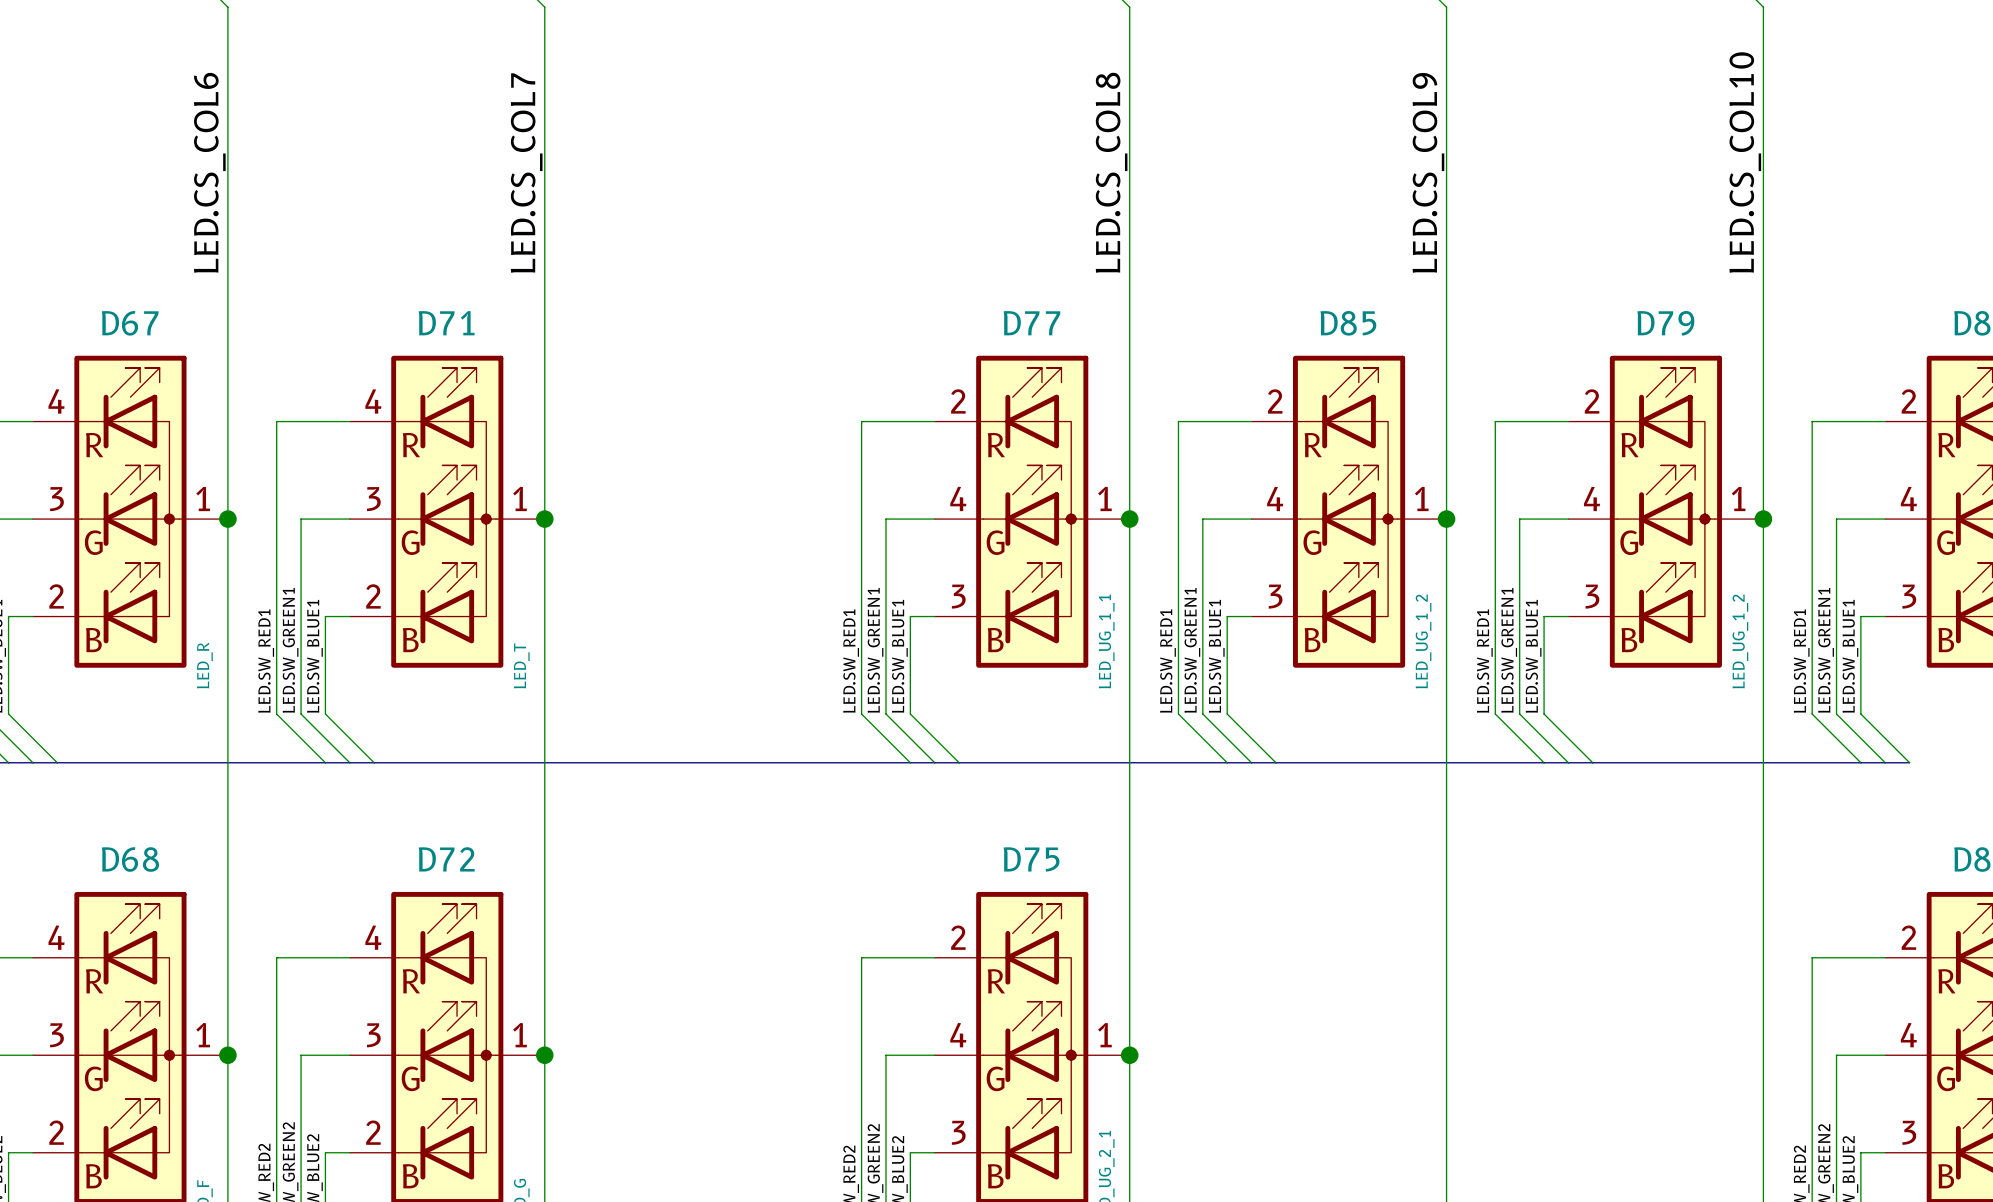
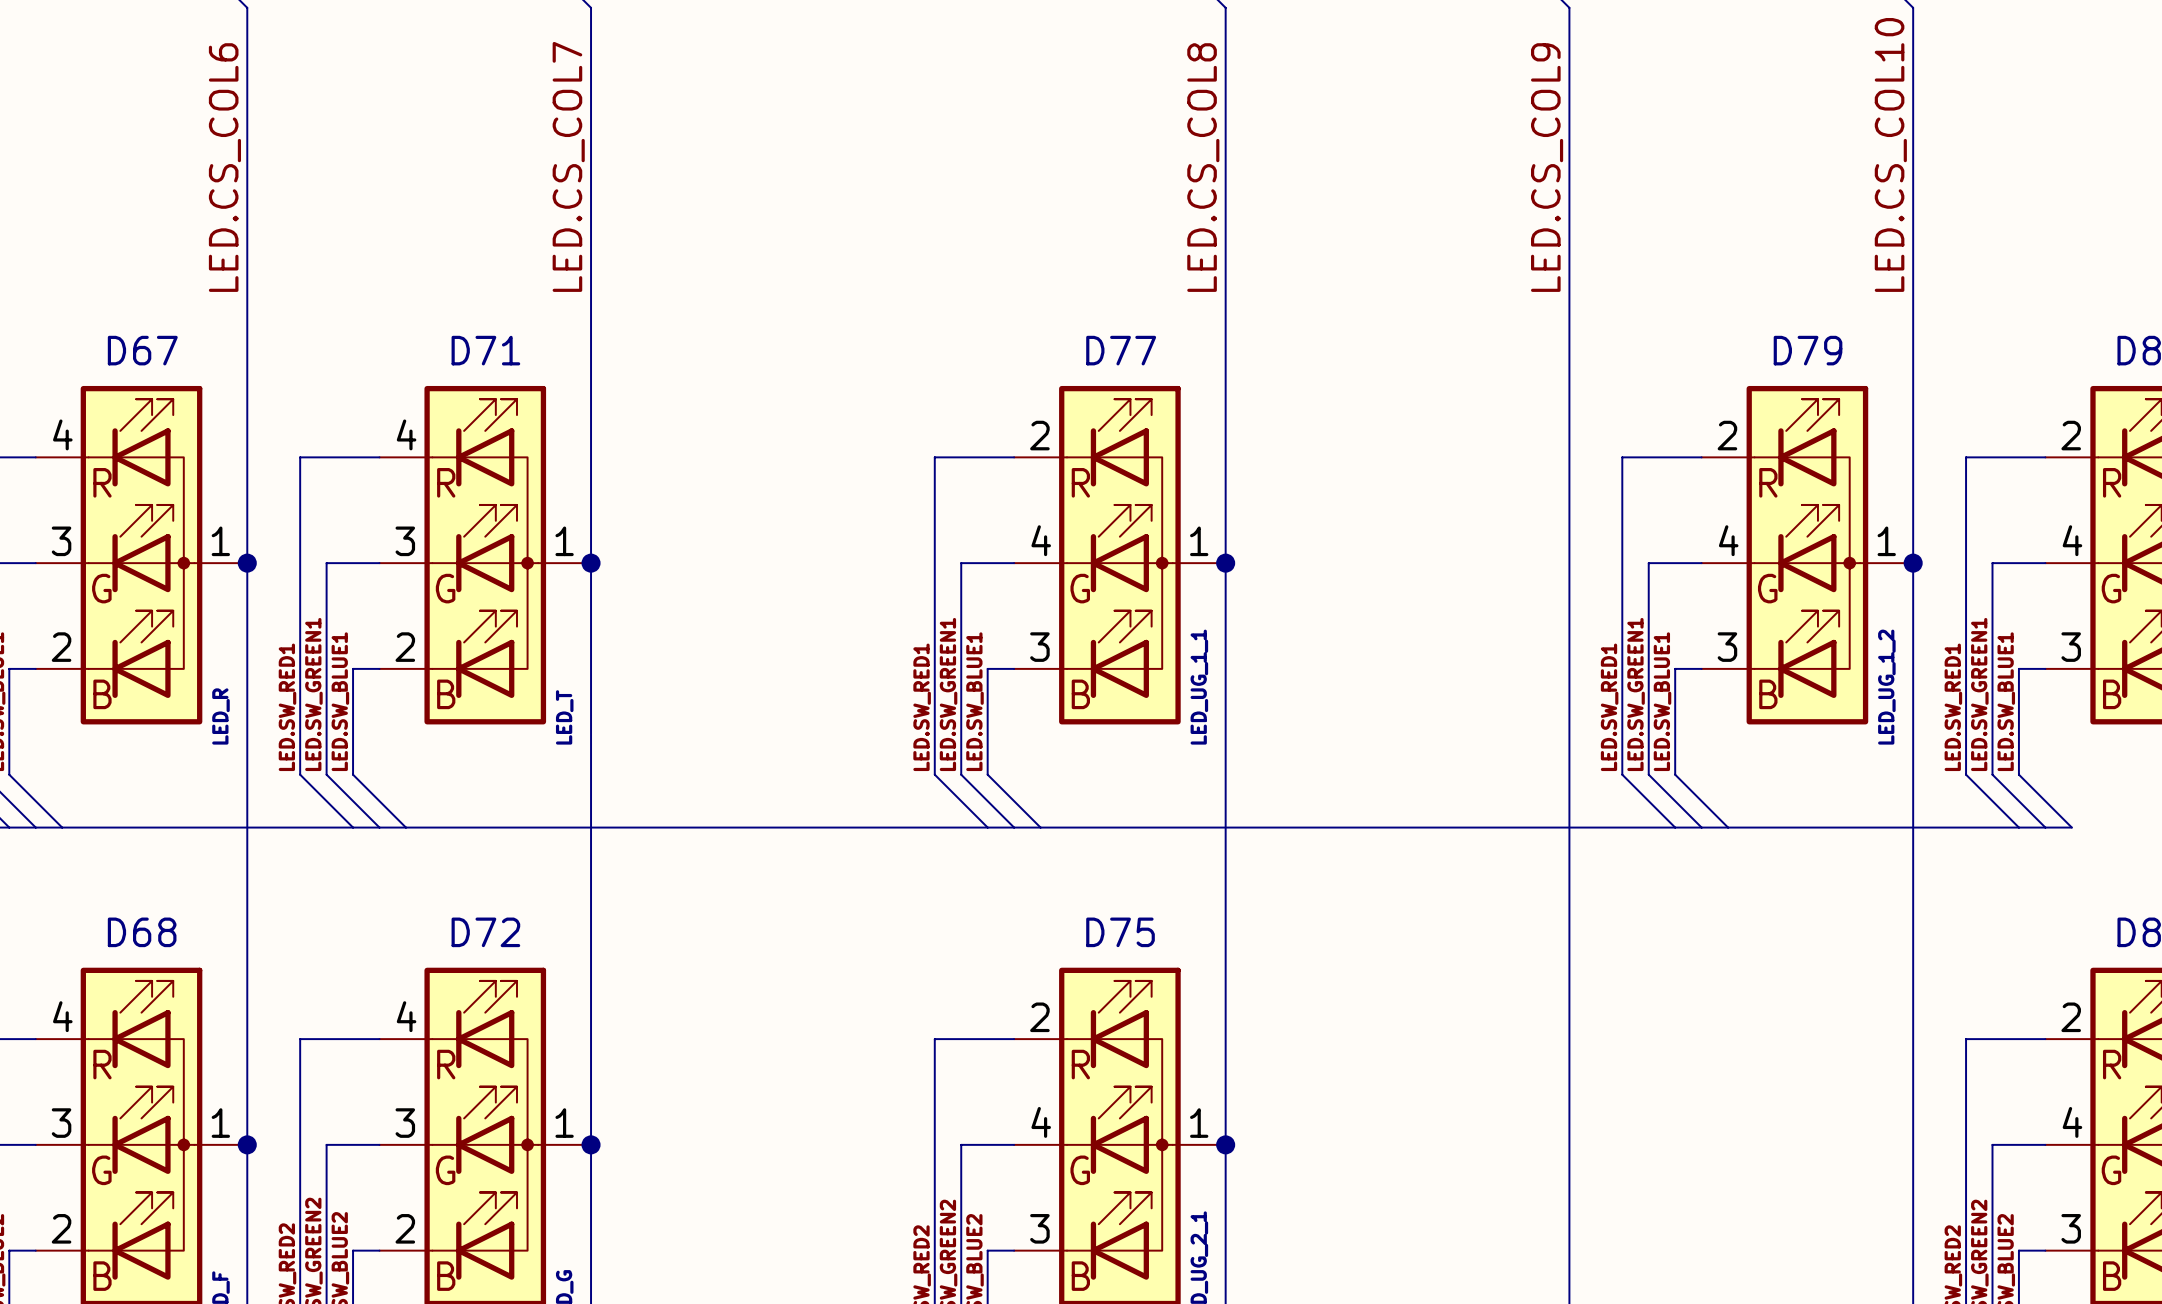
wire: (1251, 421) (1178, 421) (1178, 714) (1227, 762) -> none
D85: LED_UG_1_2 (1349, 511) -> none
wire: (1251, 519) (1202, 519) (1202, 714) (1251, 762) -> none
junction: (1446, 519) -> none
wire: (1251, 616) (1227, 616) (1227, 714) (1275, 762) -> none
label: LED.SW_GREEN1 (1192, 650) -> none
label: LED.SW_BLUE1 (1216, 656) -> none
label: LED.SW_RED1 (1168, 661) -> none

